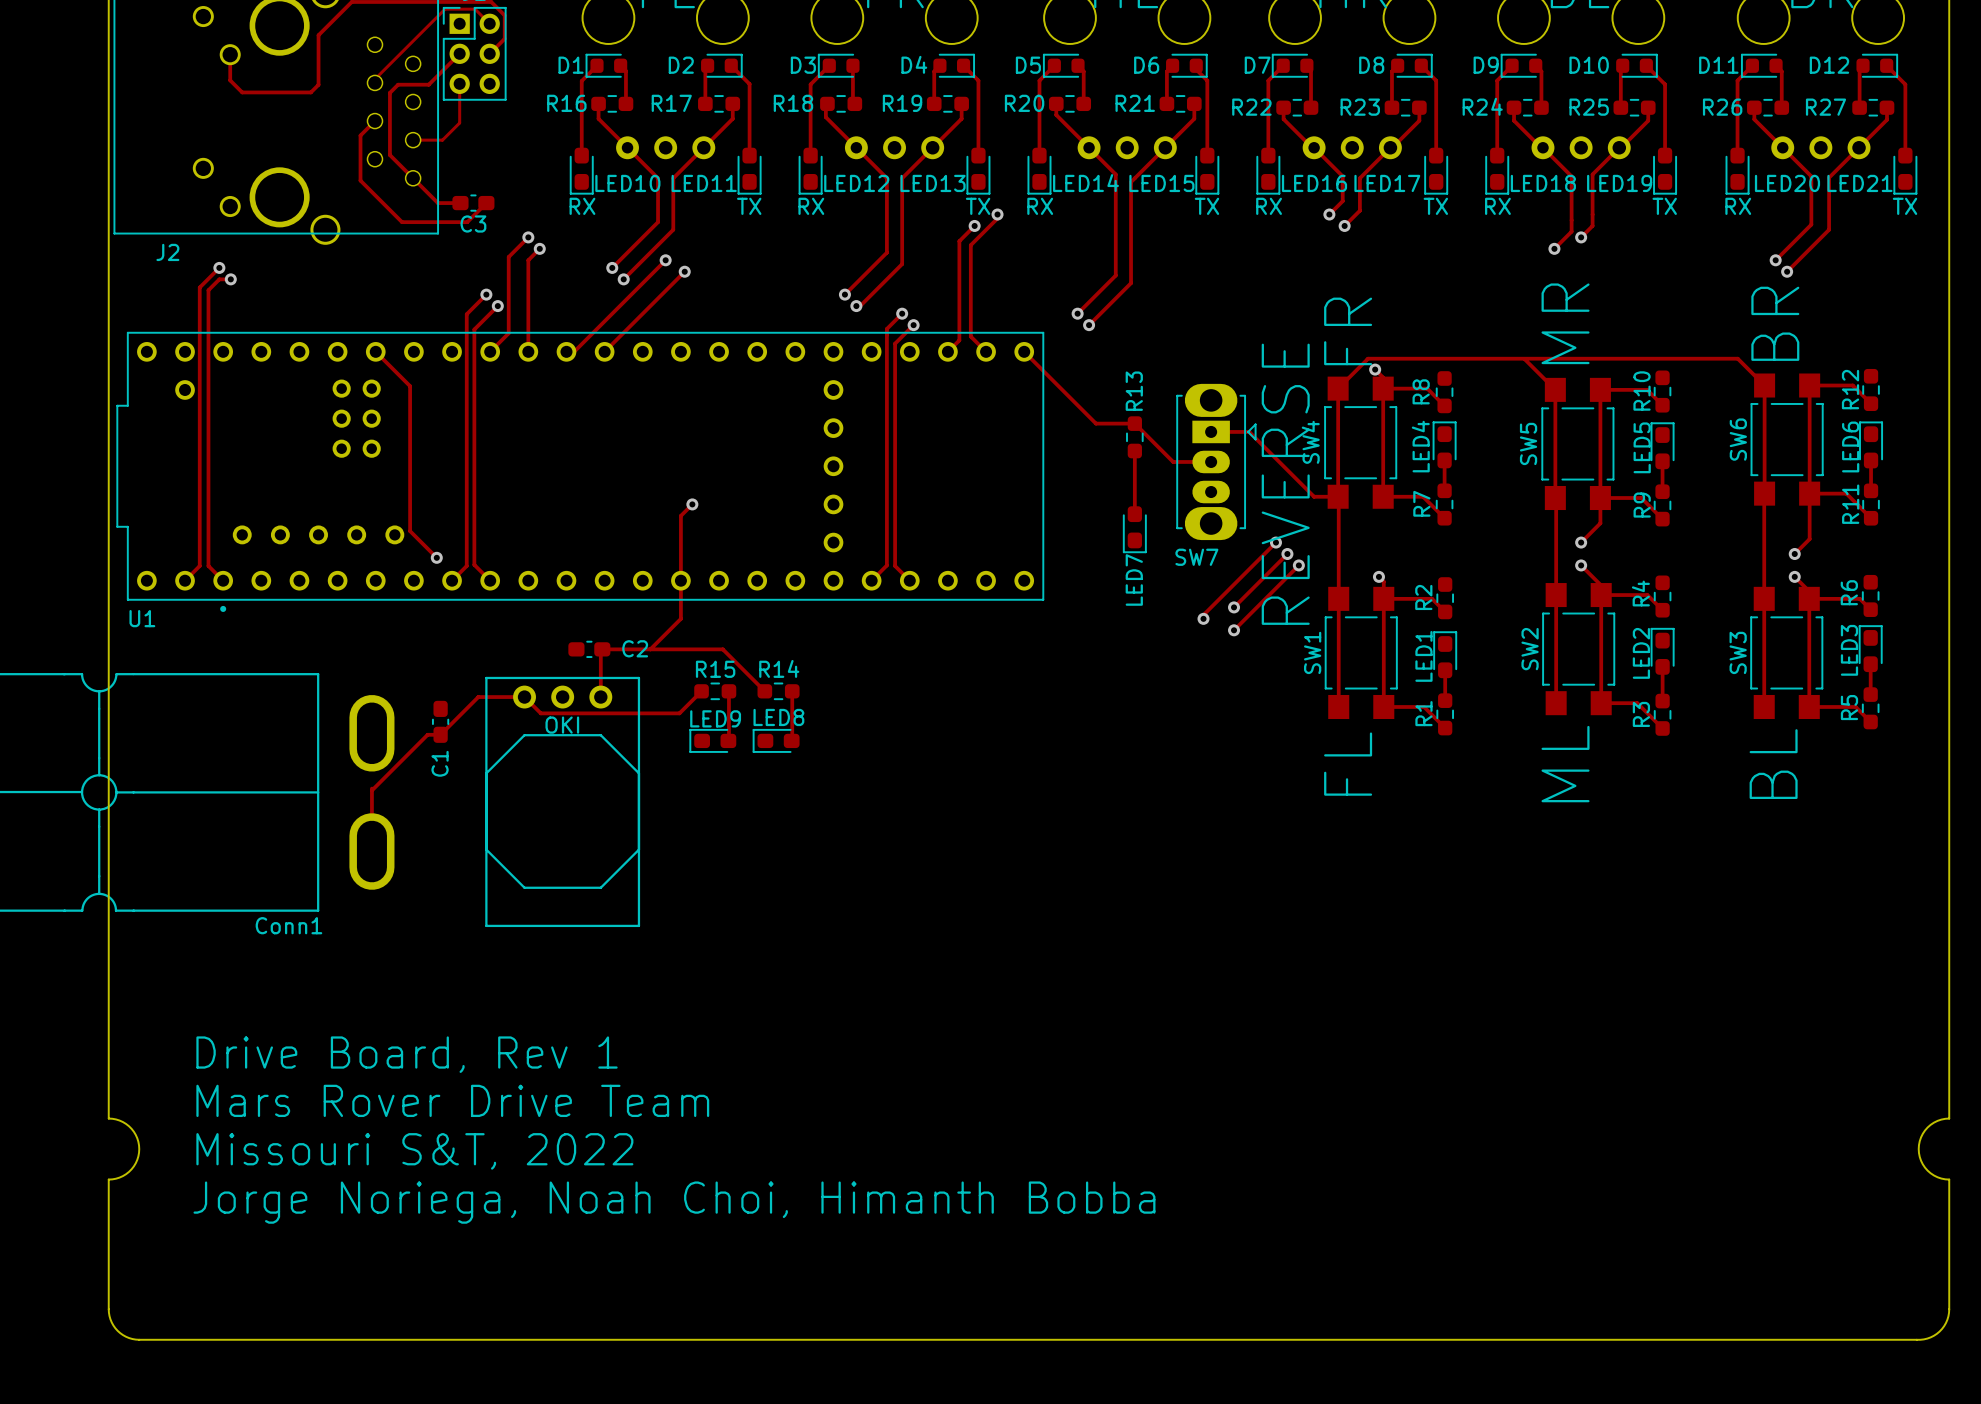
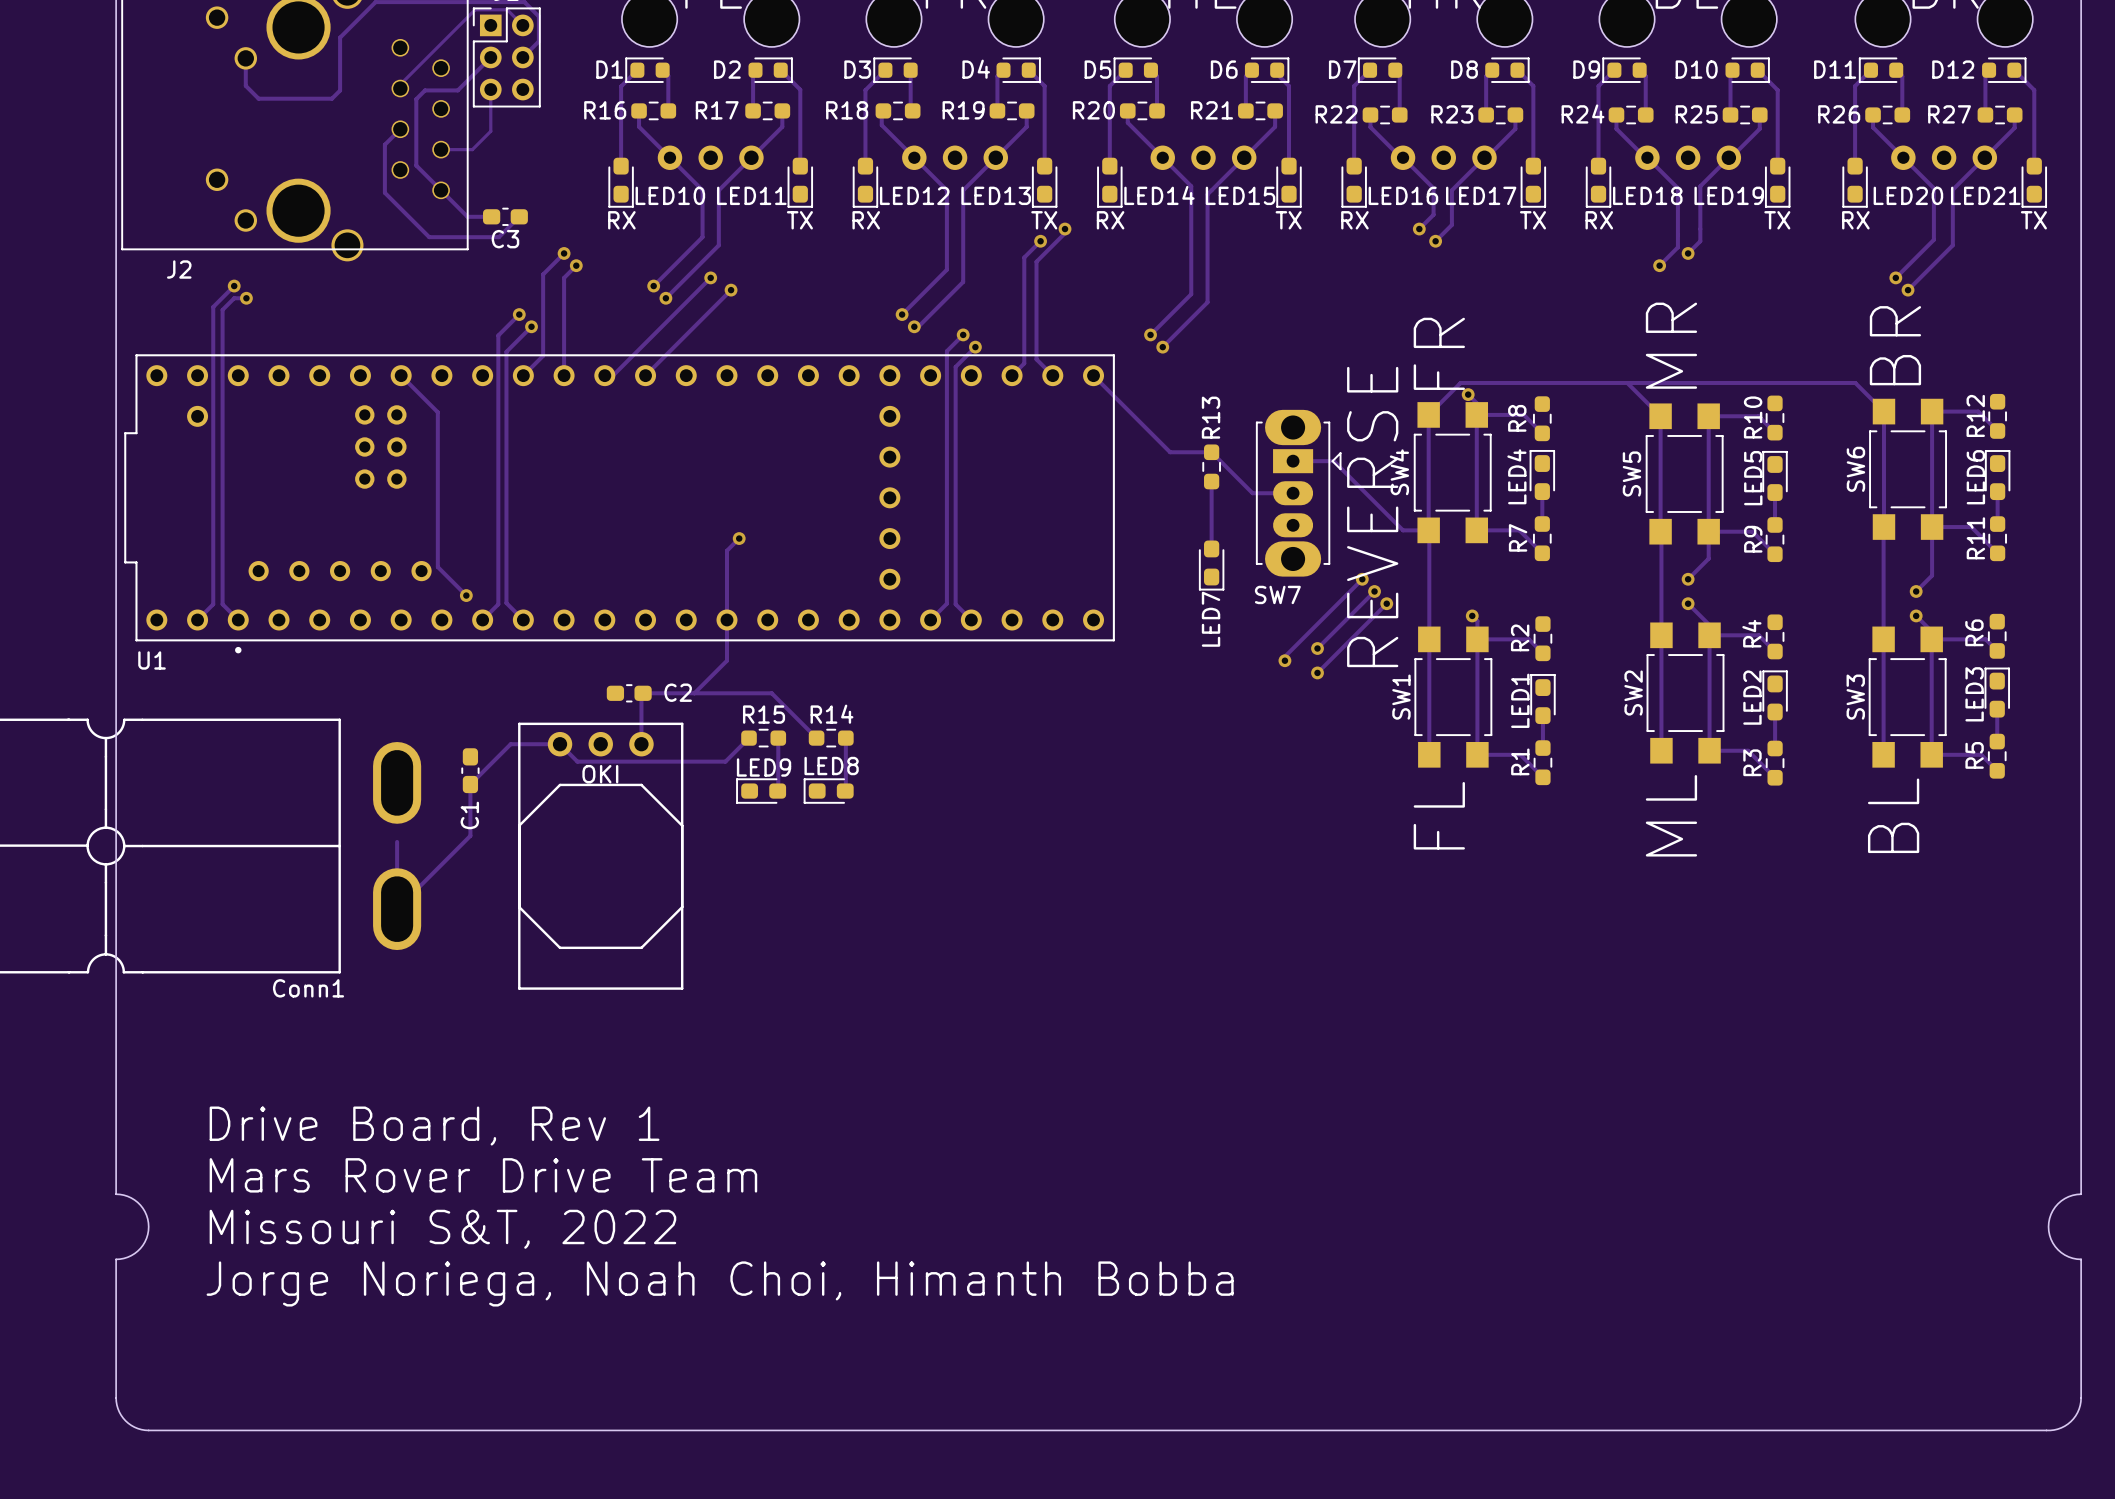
track: (440, 734) (427, 734) (371, 790) -> (470, 784) (470, 835) (397, 909)

